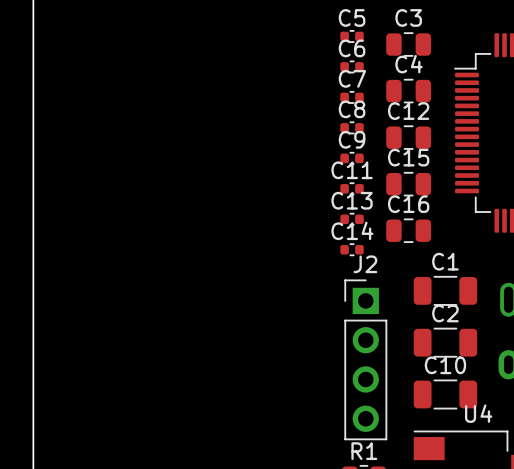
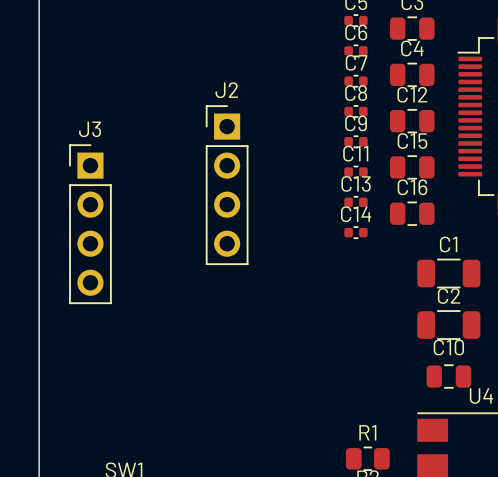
J3: none -> (90, 224)
J2 position: (365, 359) -> (227, 185)
C10 footprint: [413, 379, 478, 410] -> [426, 364, 472, 389]

